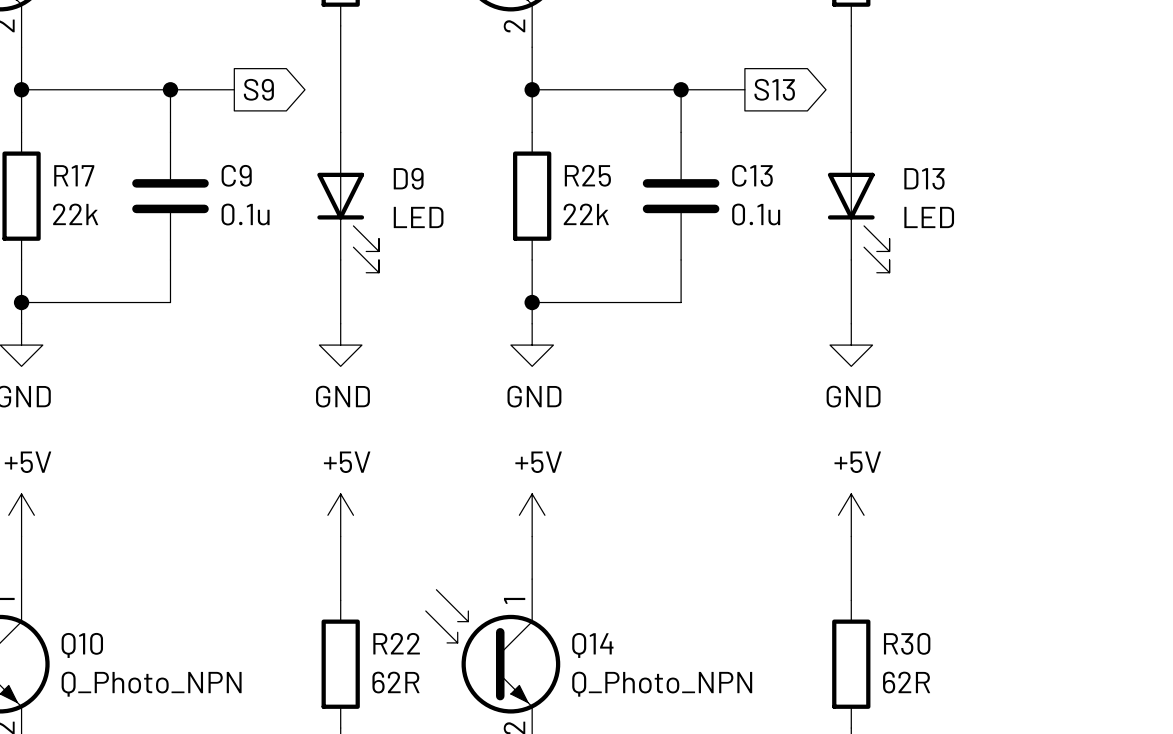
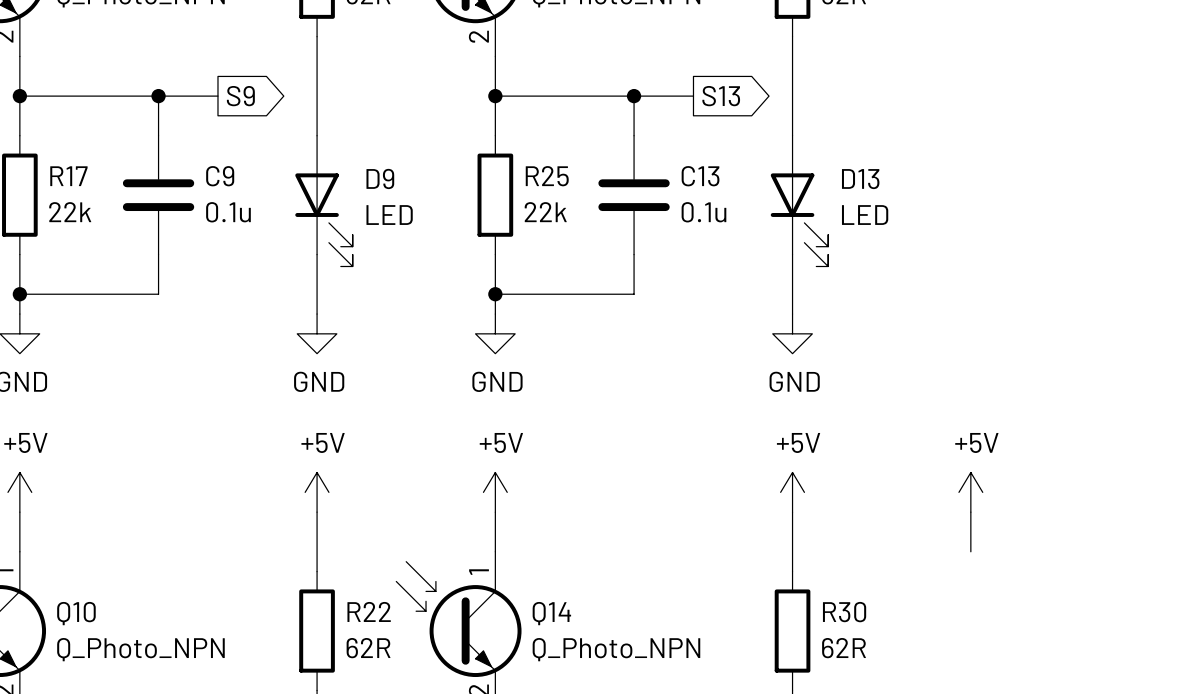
power symbol: none -> +5V (970, 492)
wire: none -> (970, 512) (970, 551)

